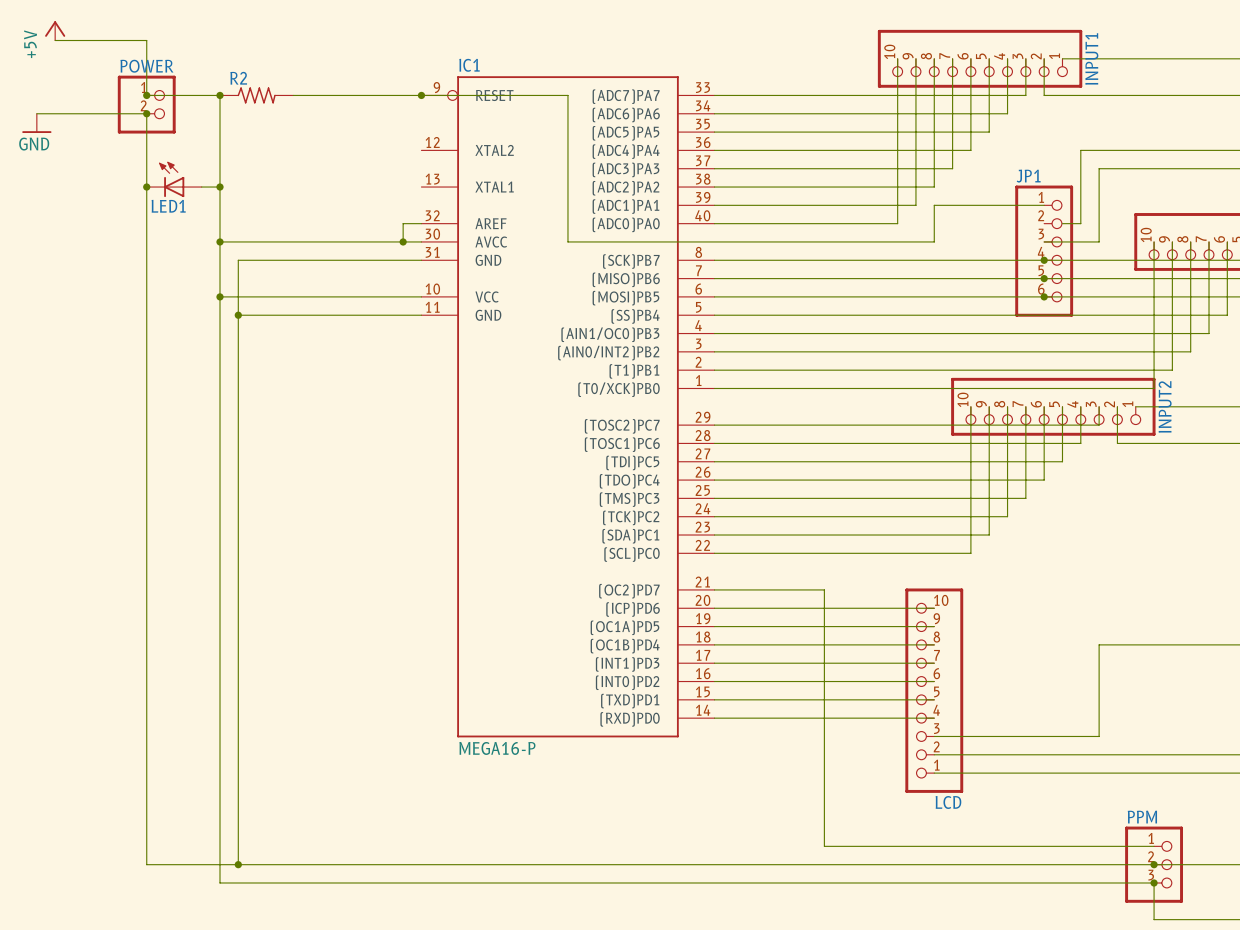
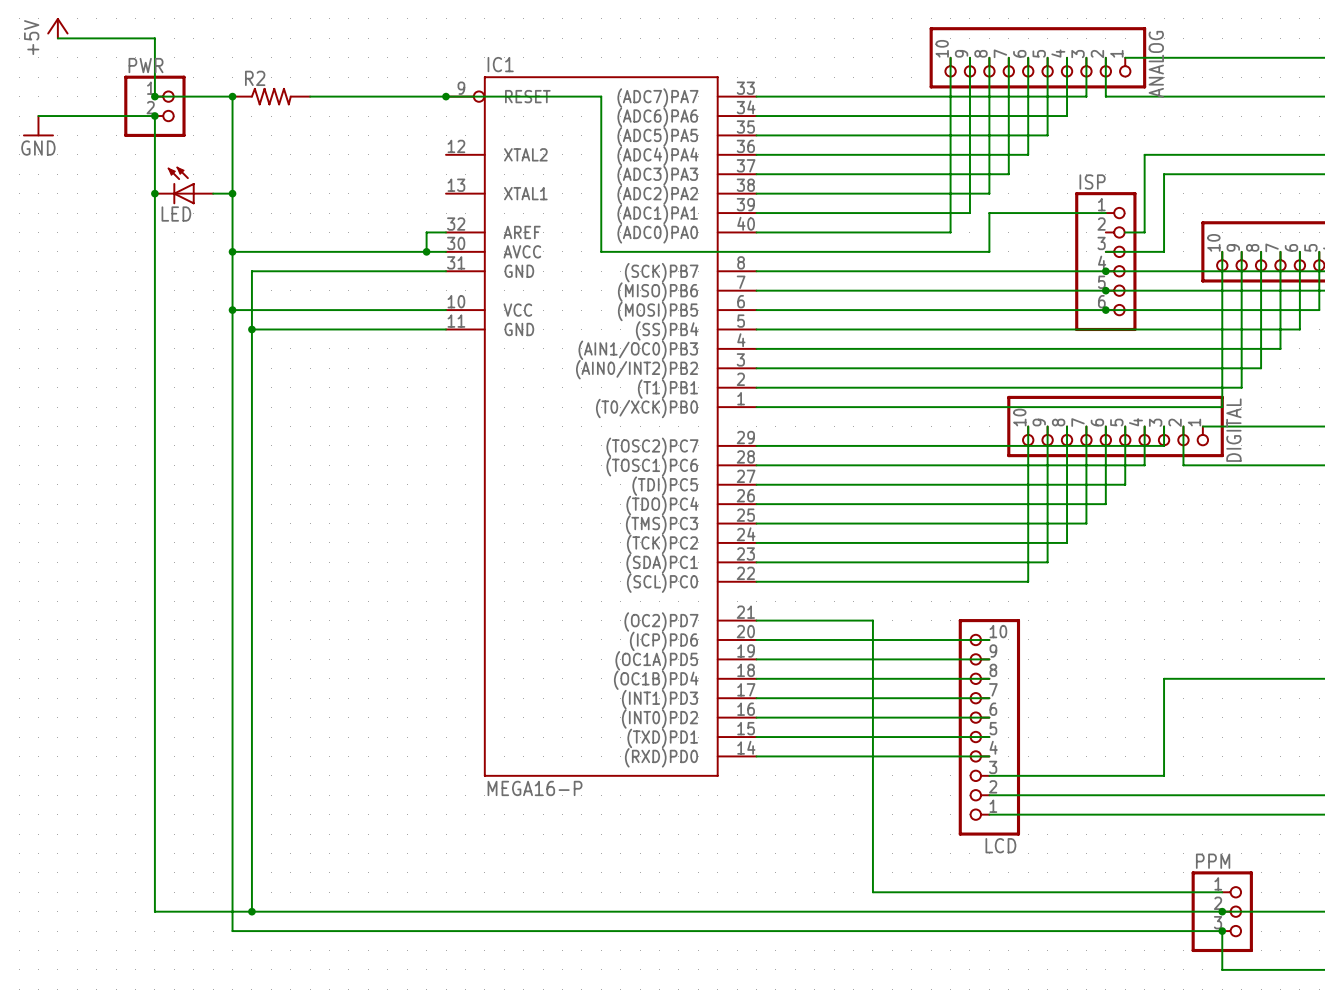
INPUT1 name: INPUT1 (1091, 59) -> ANALOG (1156, 64)
POWER name: POWER (146, 66) -> PWR (146, 65)
JP1 name: JP1 (1028, 176) -> ISP (1092, 182)
LED1 name: LED1 (168, 206) -> LED (176, 214)
INPUT2 name: INPUT2 (1165, 406) -> DIGITAL (1233, 430)

